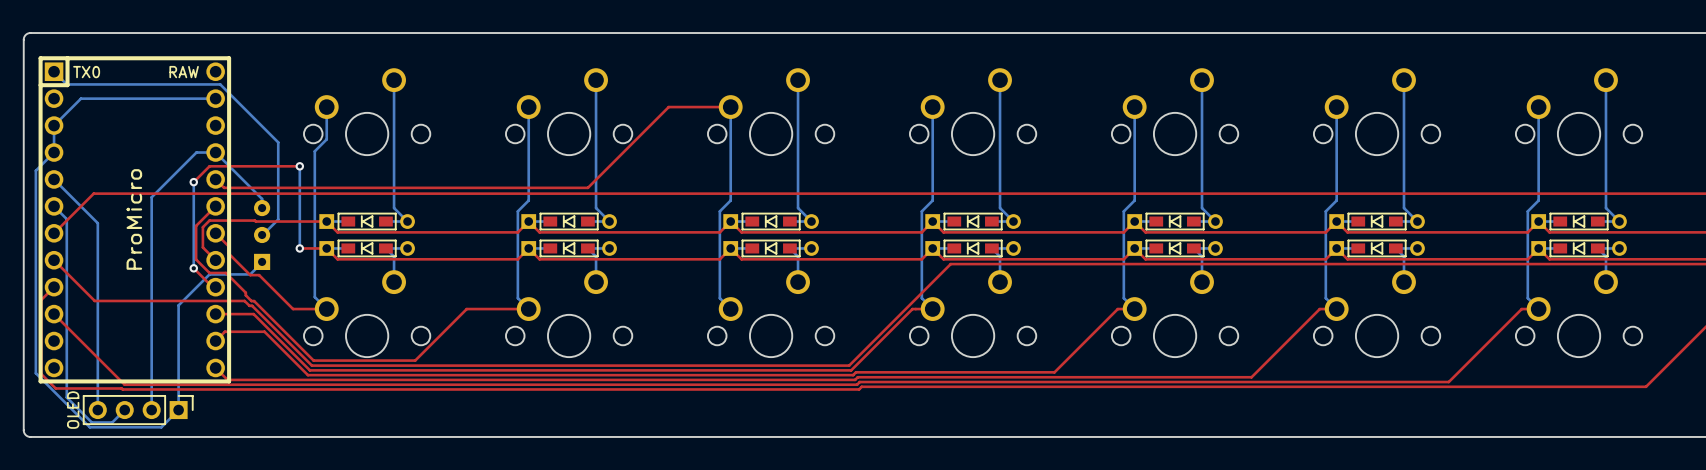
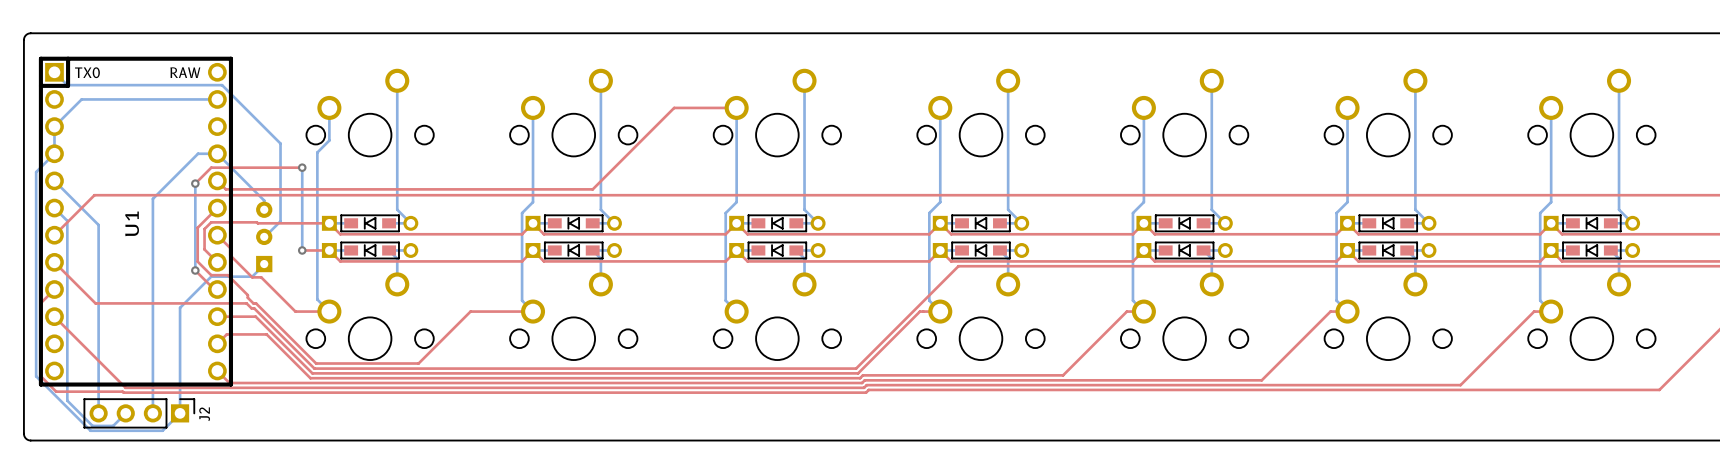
U1 value: ProMicro (134, 219) -> none
U1 name: none -> U1 (132, 223)
J2 value: OLED (73, 410) -> none
J2 name: none -> J2 (204, 414)

